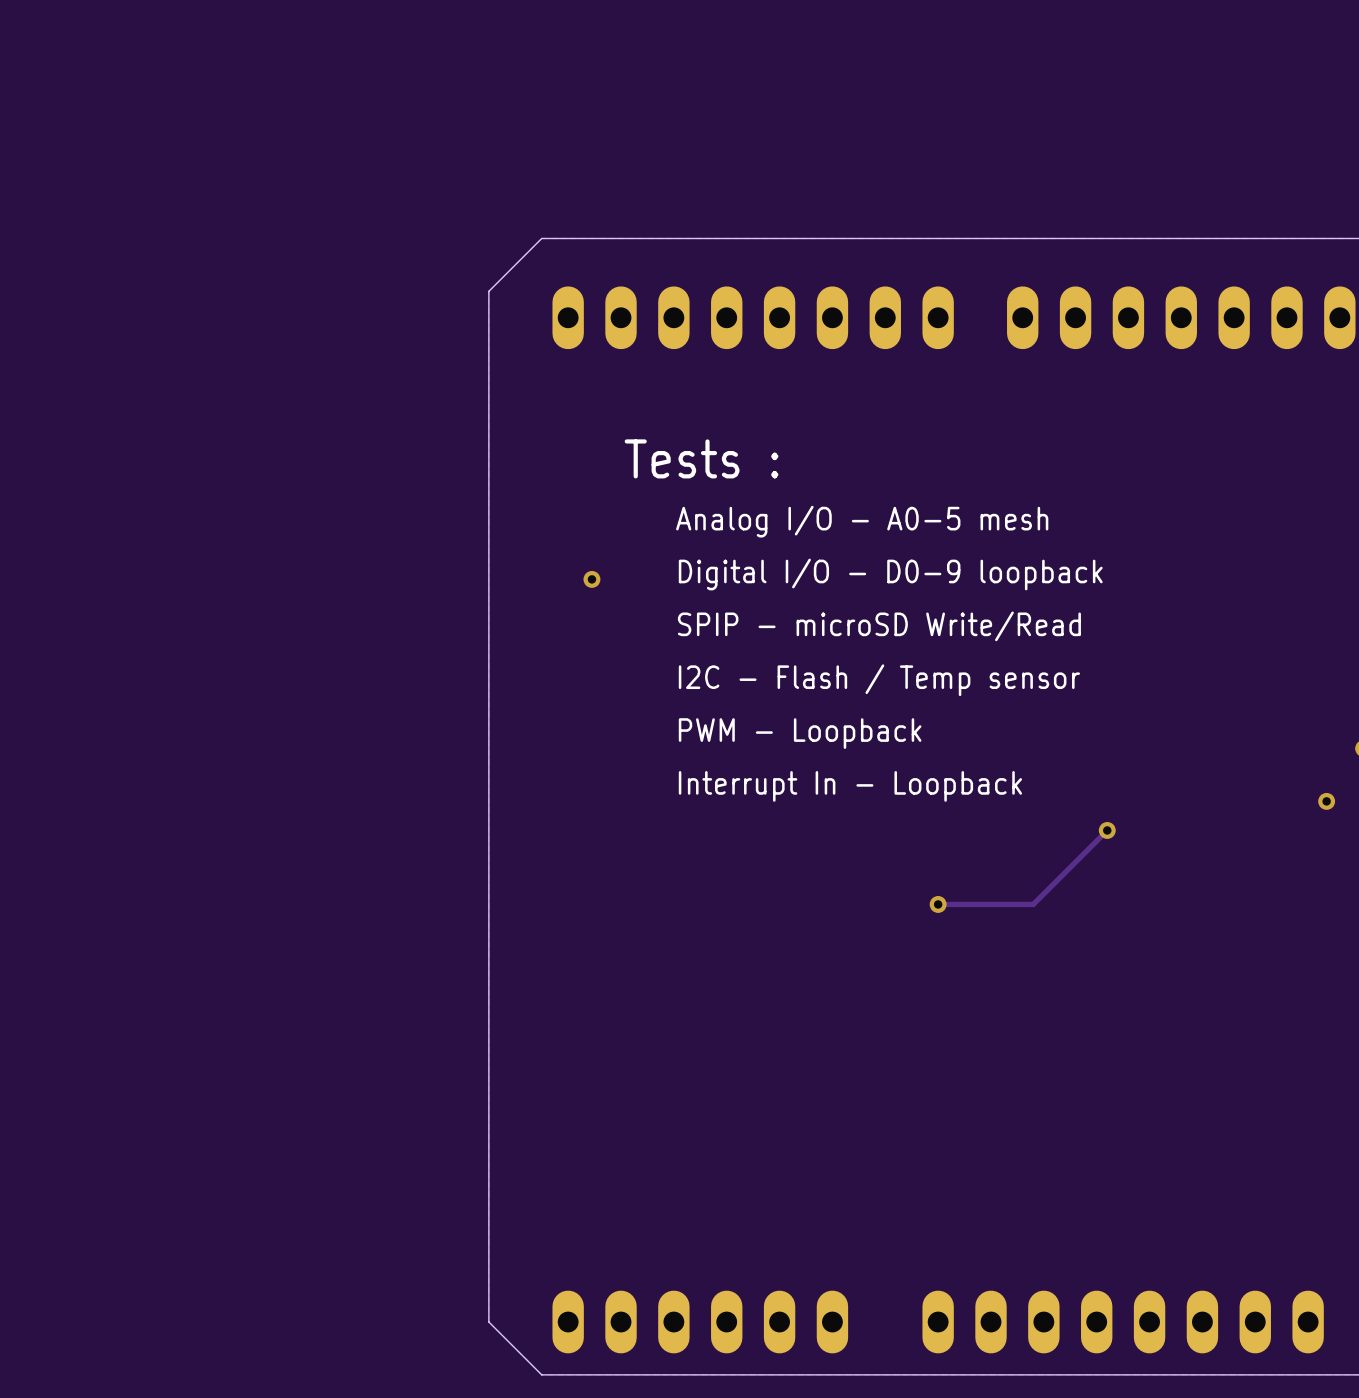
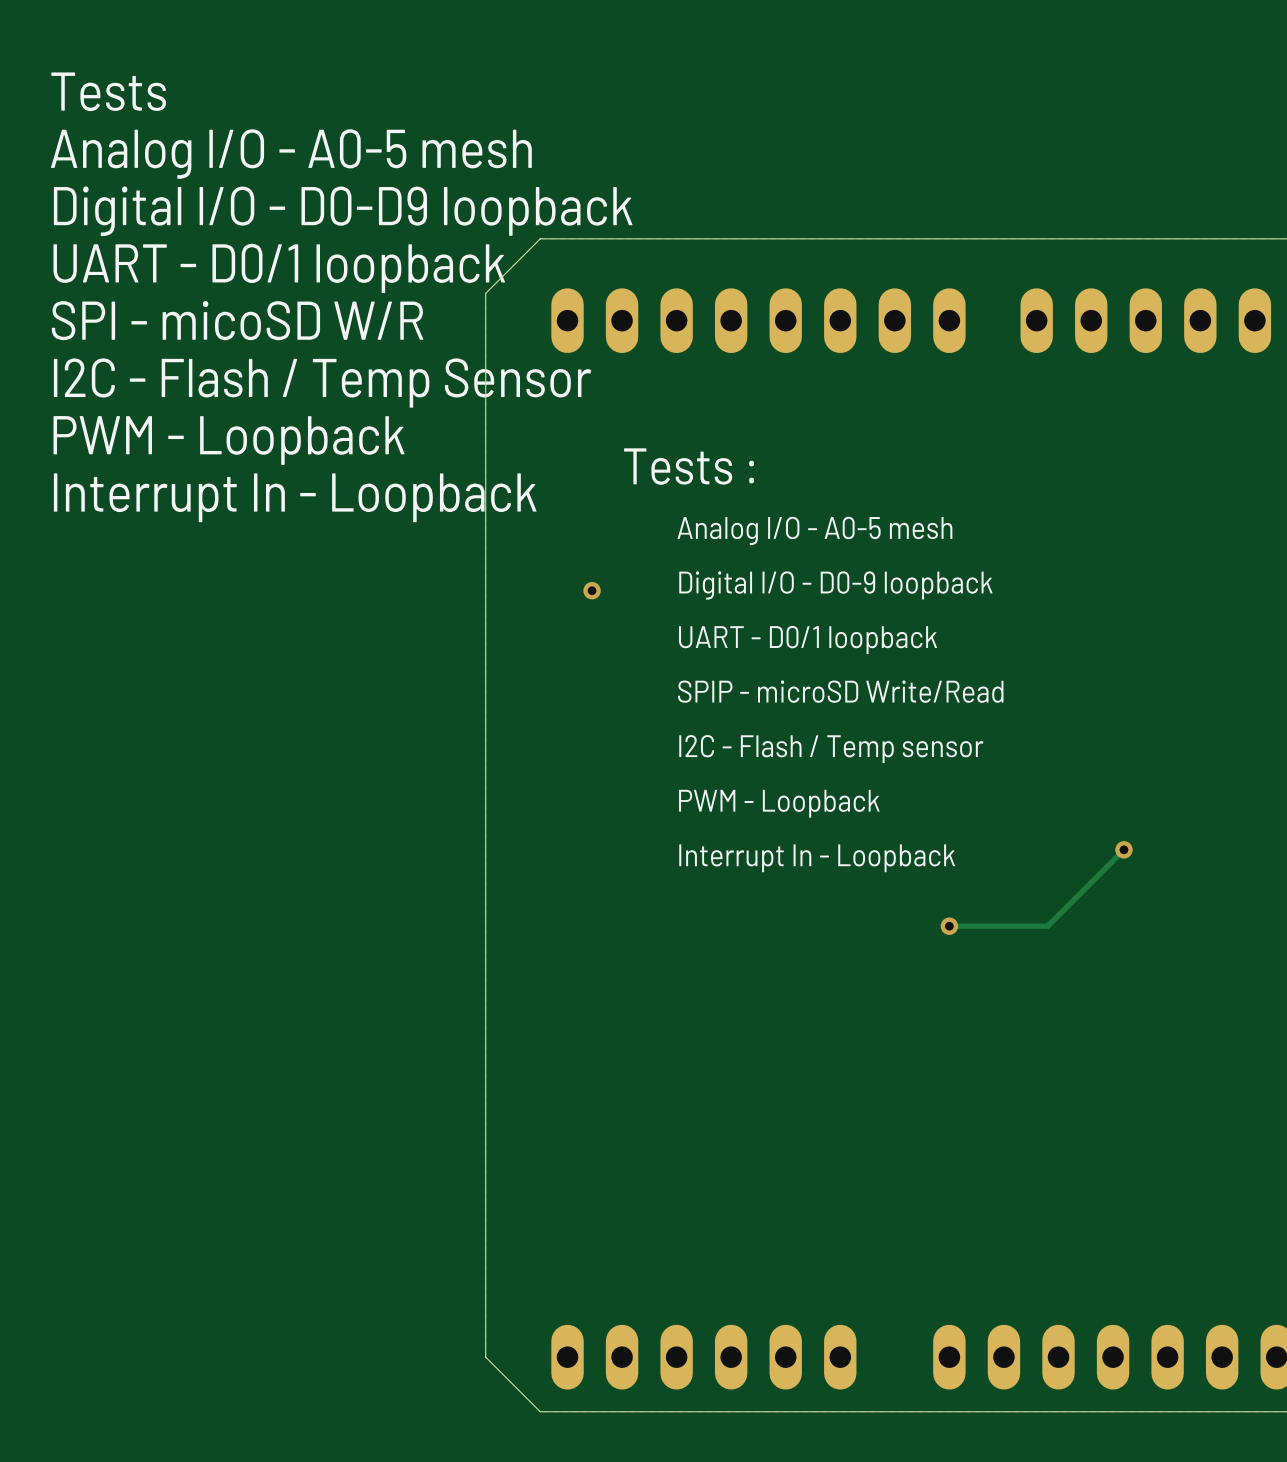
text: none -> Tests (108, 91)
text: none -> Analog I/O - A0-5 mesh (291, 154)
text: none -> Digital I/O - D0-D9 loopback (343, 211)
text: none -> UART - D0/1 loopback (279, 268)
text: none -> SPI - micoSD W/R (237, 320)
text: none -> I2C - Flash / Temp Sensor (322, 383)
text: none -> PWM - Loopback (229, 440)
text: none -> Interrupt In - Loopback (295, 497)
text: SPIP - microSD Write/Read (879, 626) -> UART - D0/1 loopback (808, 639)
text: I2C - Flash / Temp sensor (879, 680) -> SPIP - microSD Write/Read (840, 691)
text: PWM - Loopback (800, 733) -> I2C - Flash / Temp sensor (831, 749)
text: Interrupt In - Loopback (850, 786) -> PWM - Loopback (779, 803)
text: none -> Interrupt In - Loopback (817, 858)

